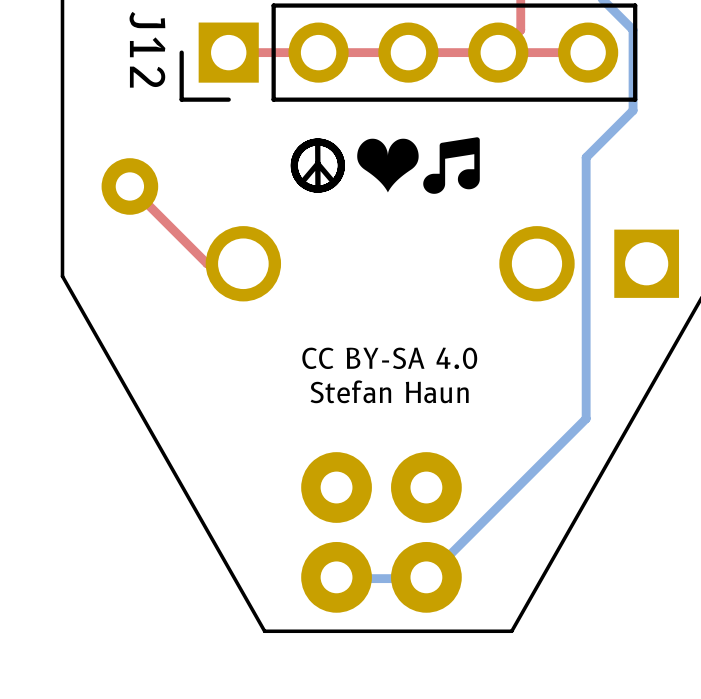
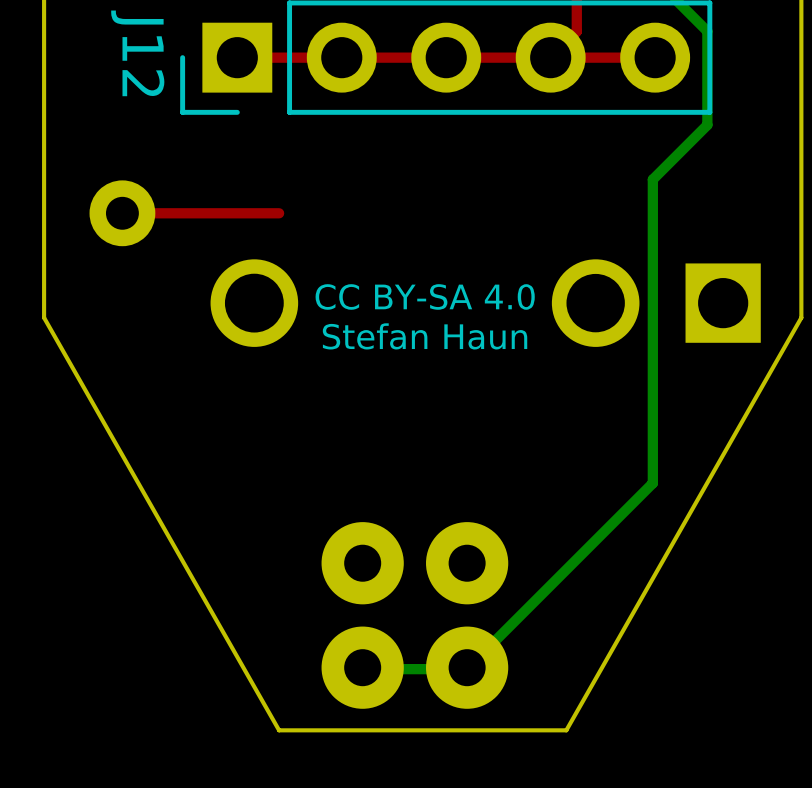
drawing: [357, 137, 480, 194] -> none
line: (320, 142) (329, 144) (336, 150) (340, 158) (341, 167) (338, 176) (332, 183) (324, 188) (315, 188) (306, 186) (299, 180) (295, 172) (294, 163) (297, 154) (302, 147) (310, 143) (320, 142) -> none
line: (317, 144) (317, 187) -> none
line: (317, 163) (332, 181) -> none
line: (318, 163) (302, 181) -> none
top track: (129, 186) (207, 263) (243, 263) -> (122, 213) (279, 213)
text position: CC BY-SA 4.0 (389, 358) -> CC BY-SA 4.0 (425, 296)
text position: Stefan Haun (389, 391) -> Stefan Haun (425, 336)

